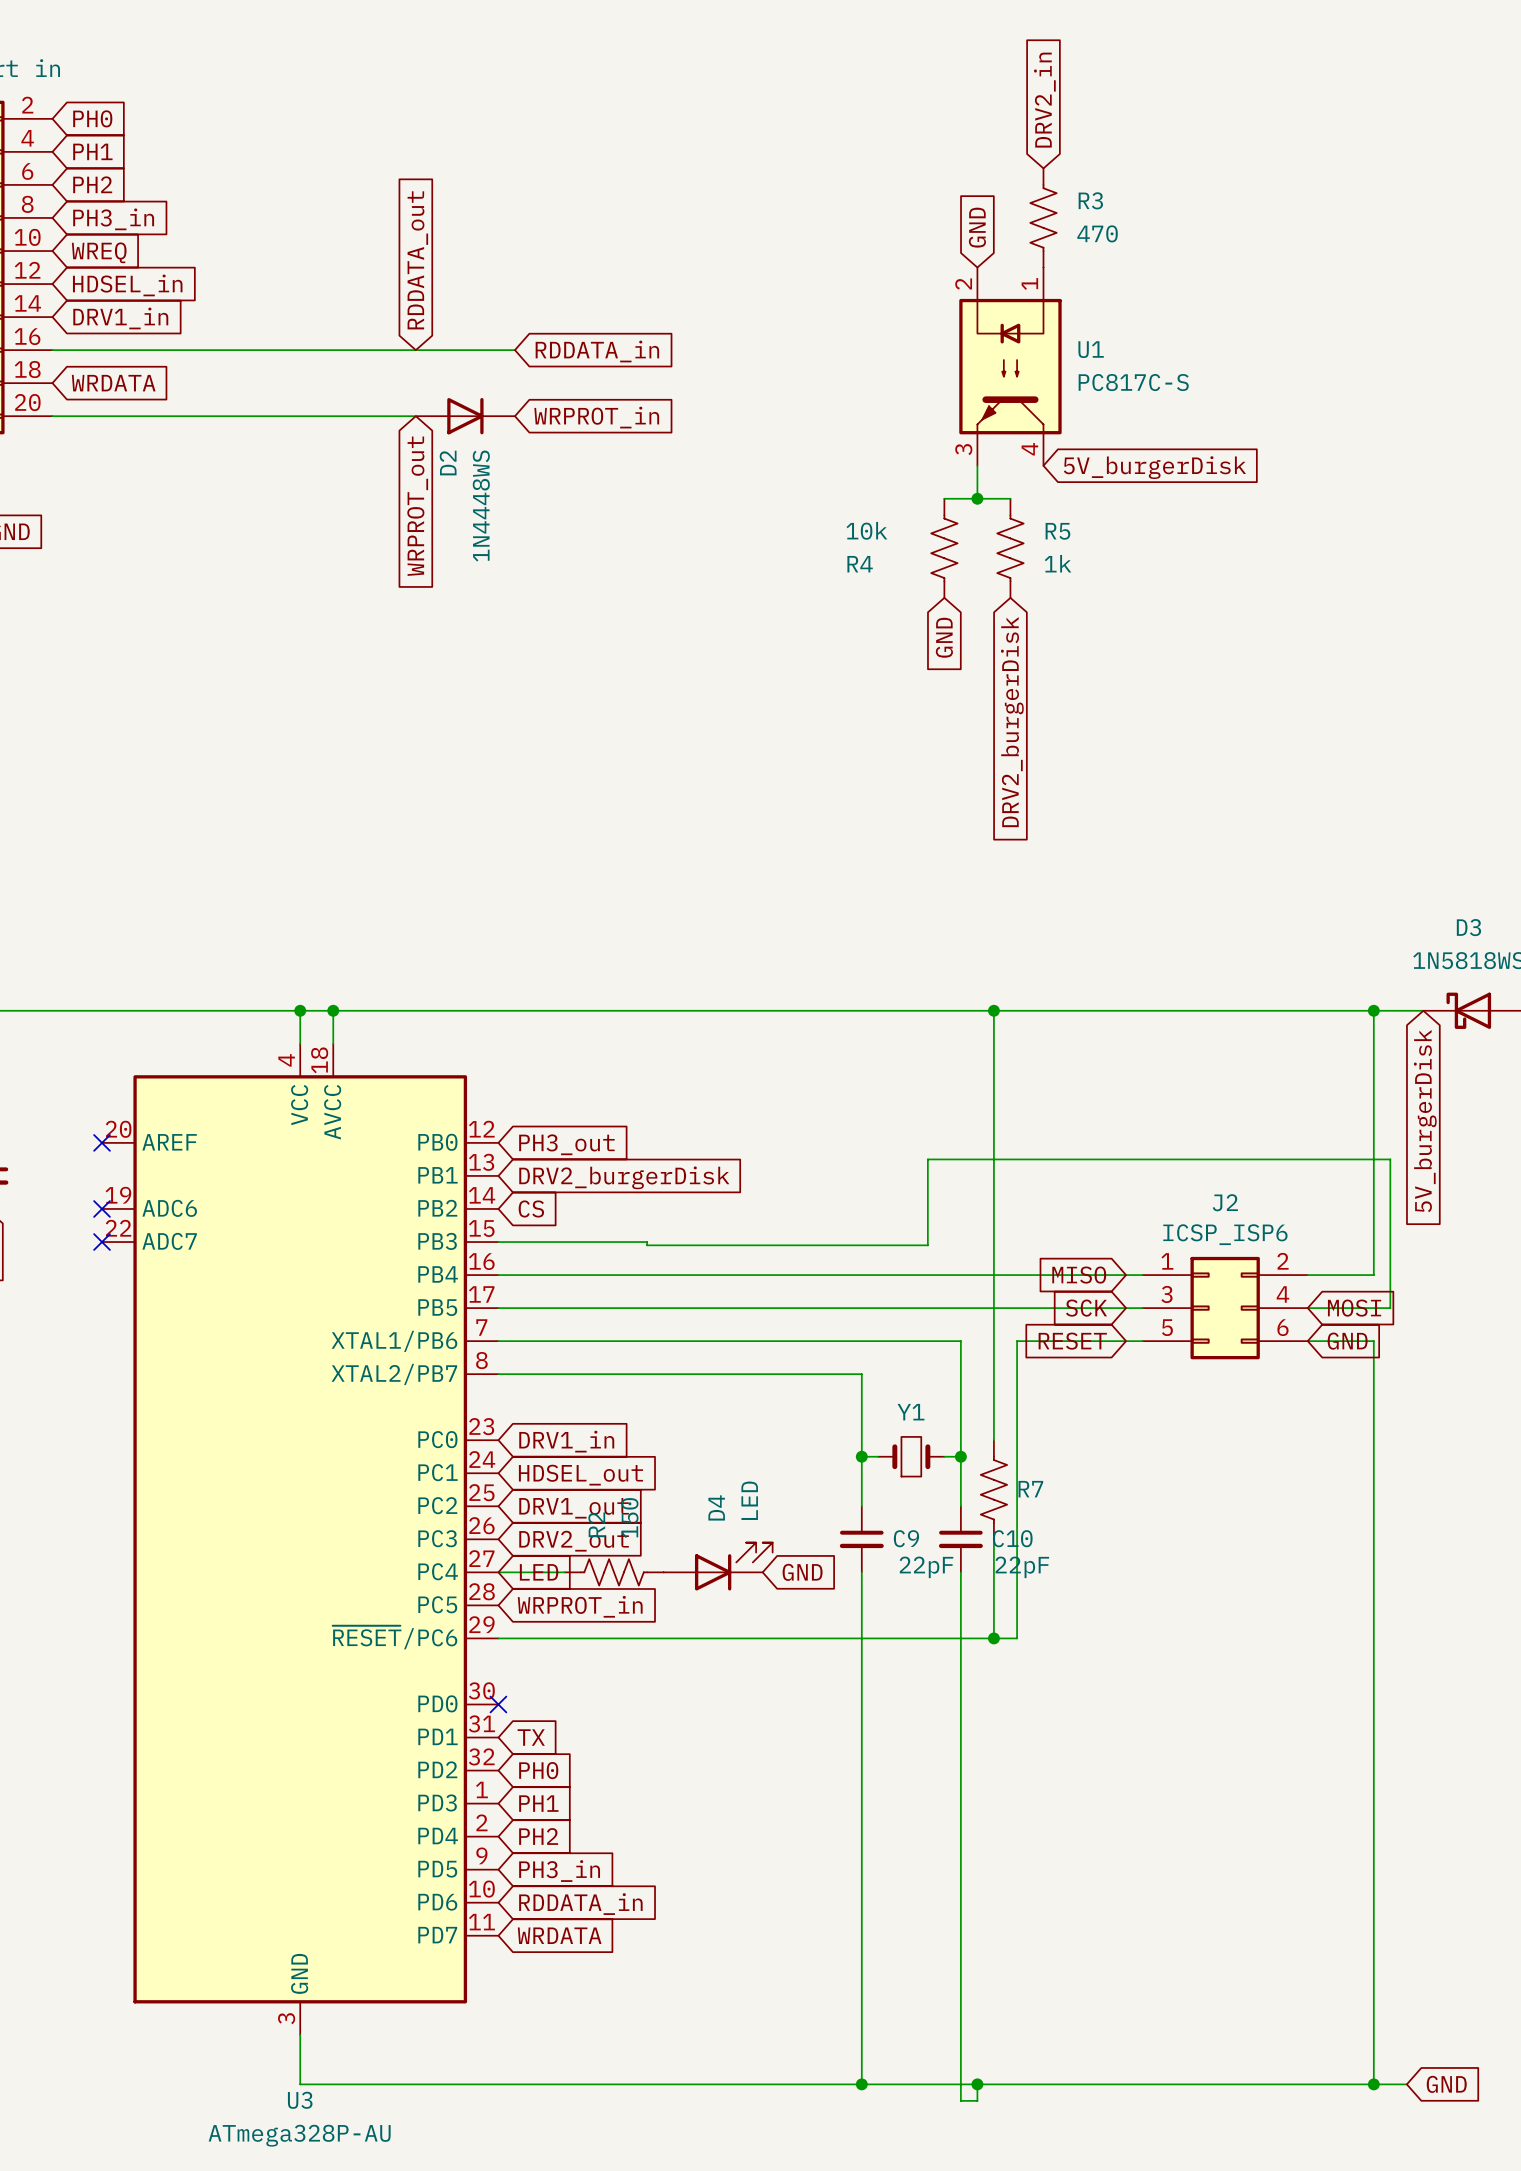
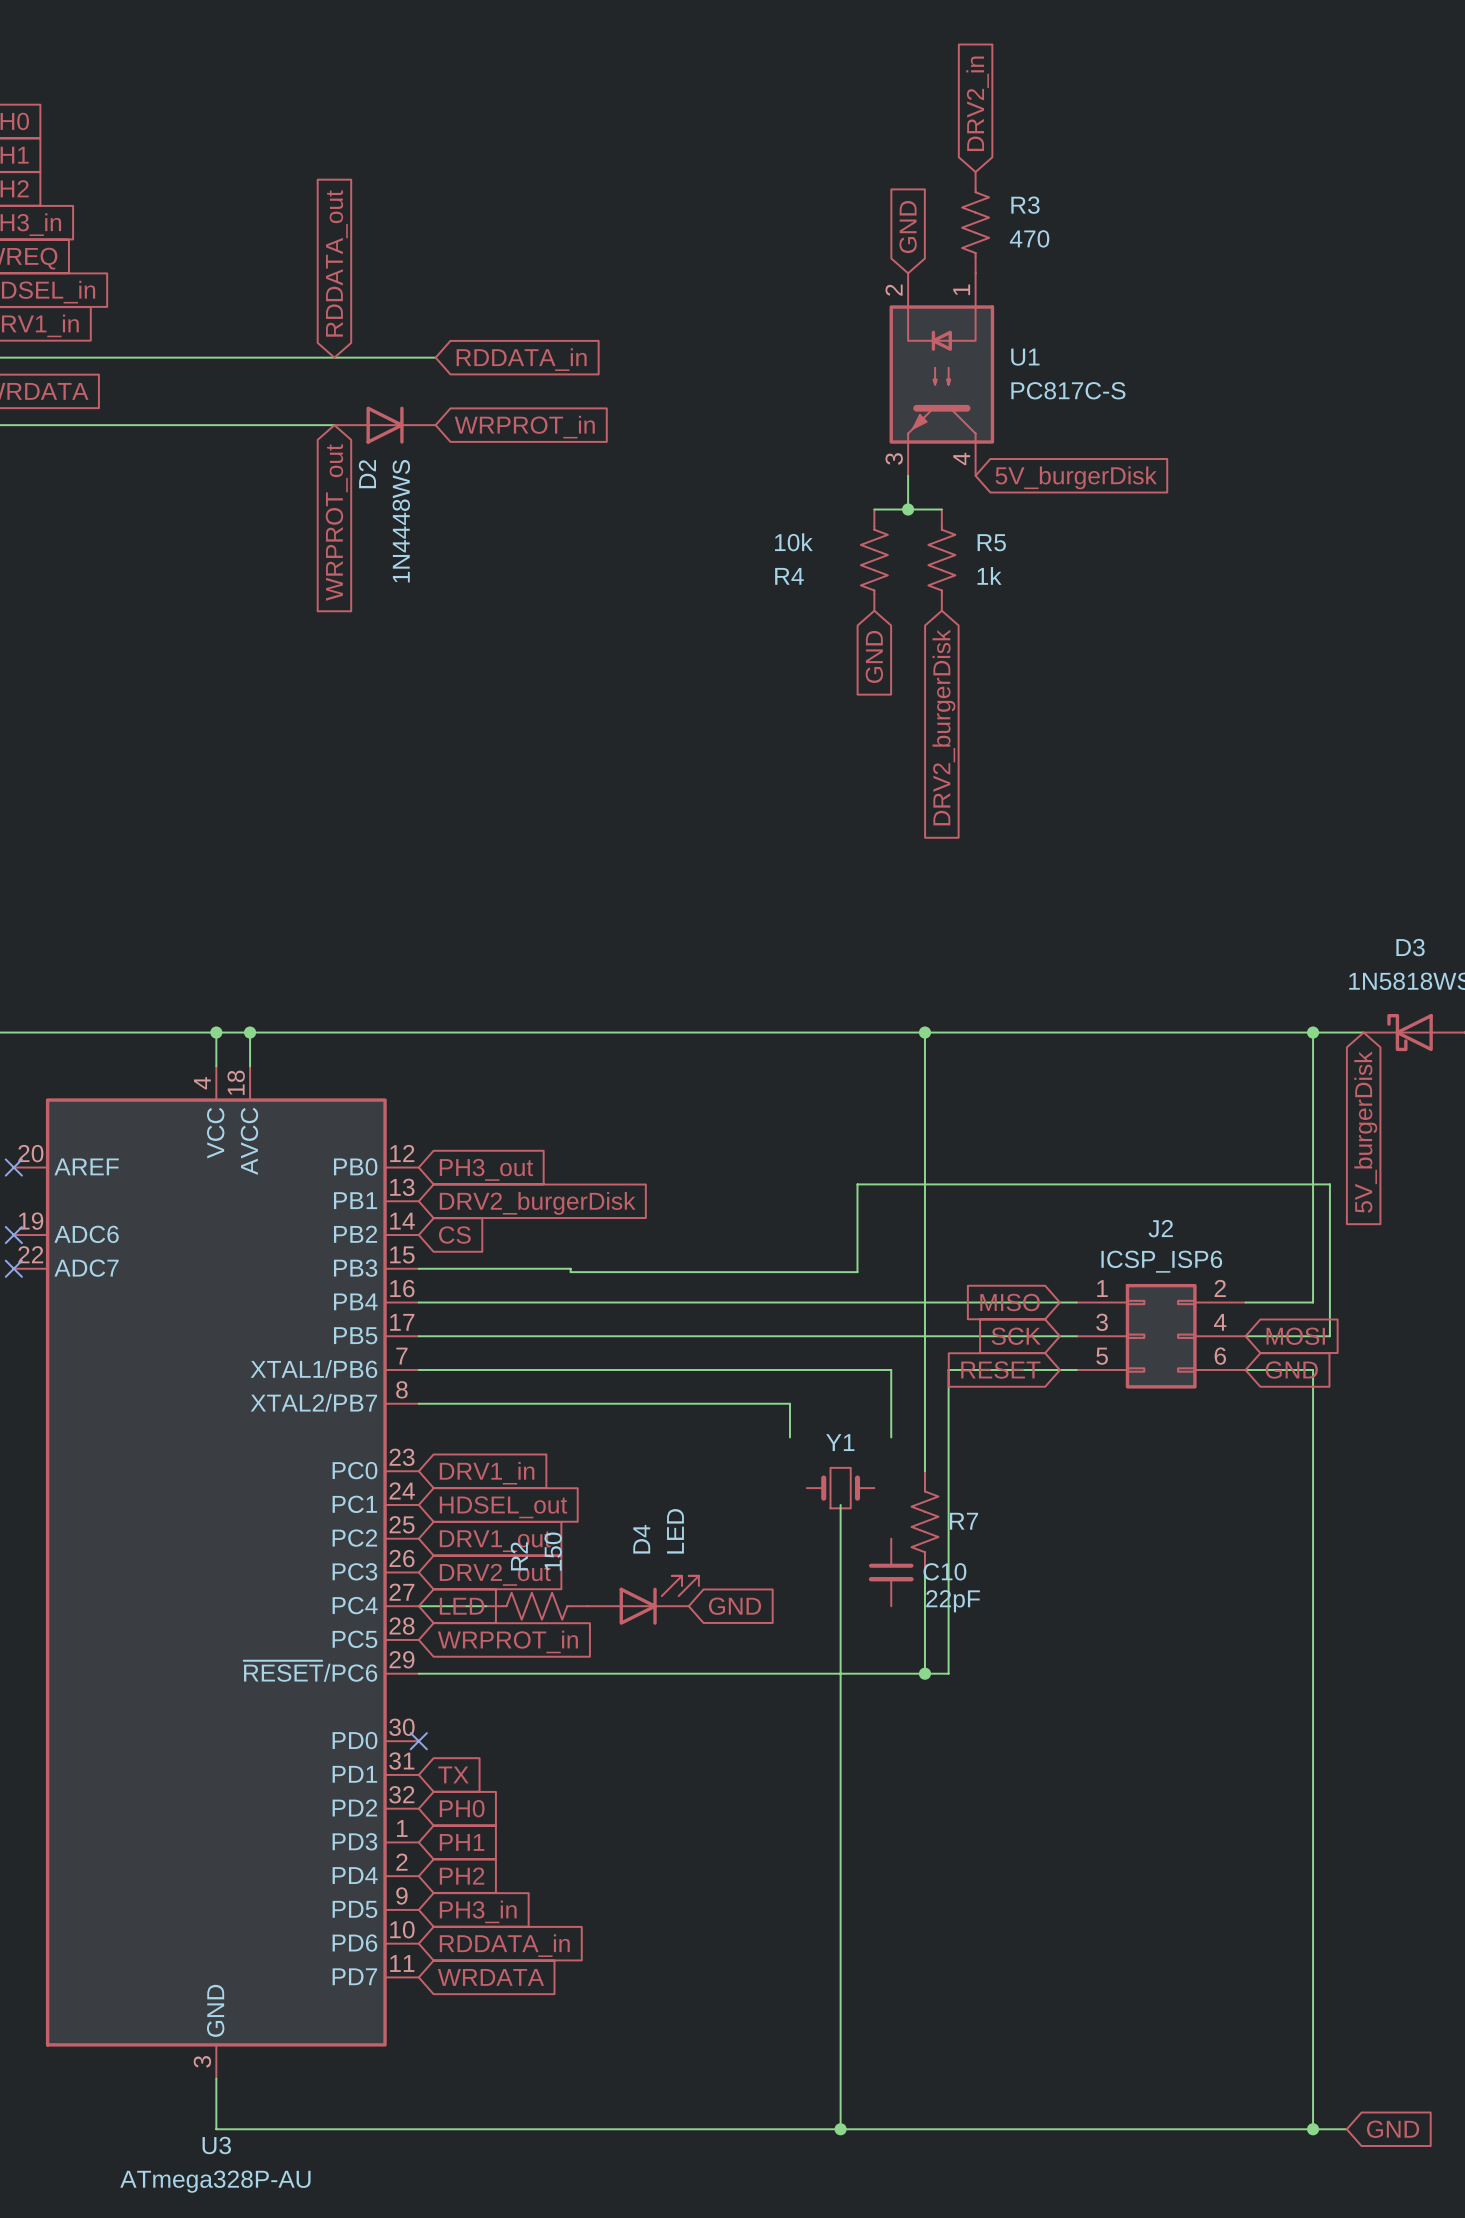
wire: (861, 1407) (861, 1506) -> none
wire: (960, 1407) (960, 1506) -> none
wire: (861, 1456) (878, 1456) -> none
junction: (861, 1456) -> none
wire: (944, 1456) (960, 1456) -> none
junction: (960, 1456) -> none
wire: none -> (840, 1504) (840, 2129)
C9: 22pF (861, 1539) -> none
wire: (861, 1572) (861, 2084) -> none
wire: (960, 1572) (960, 2100) (977, 2100) (977, 2084) -> none
junction: (861, 2084) -> none
junction: none -> (840, 2129)
junction: (977, 2084) -> none

